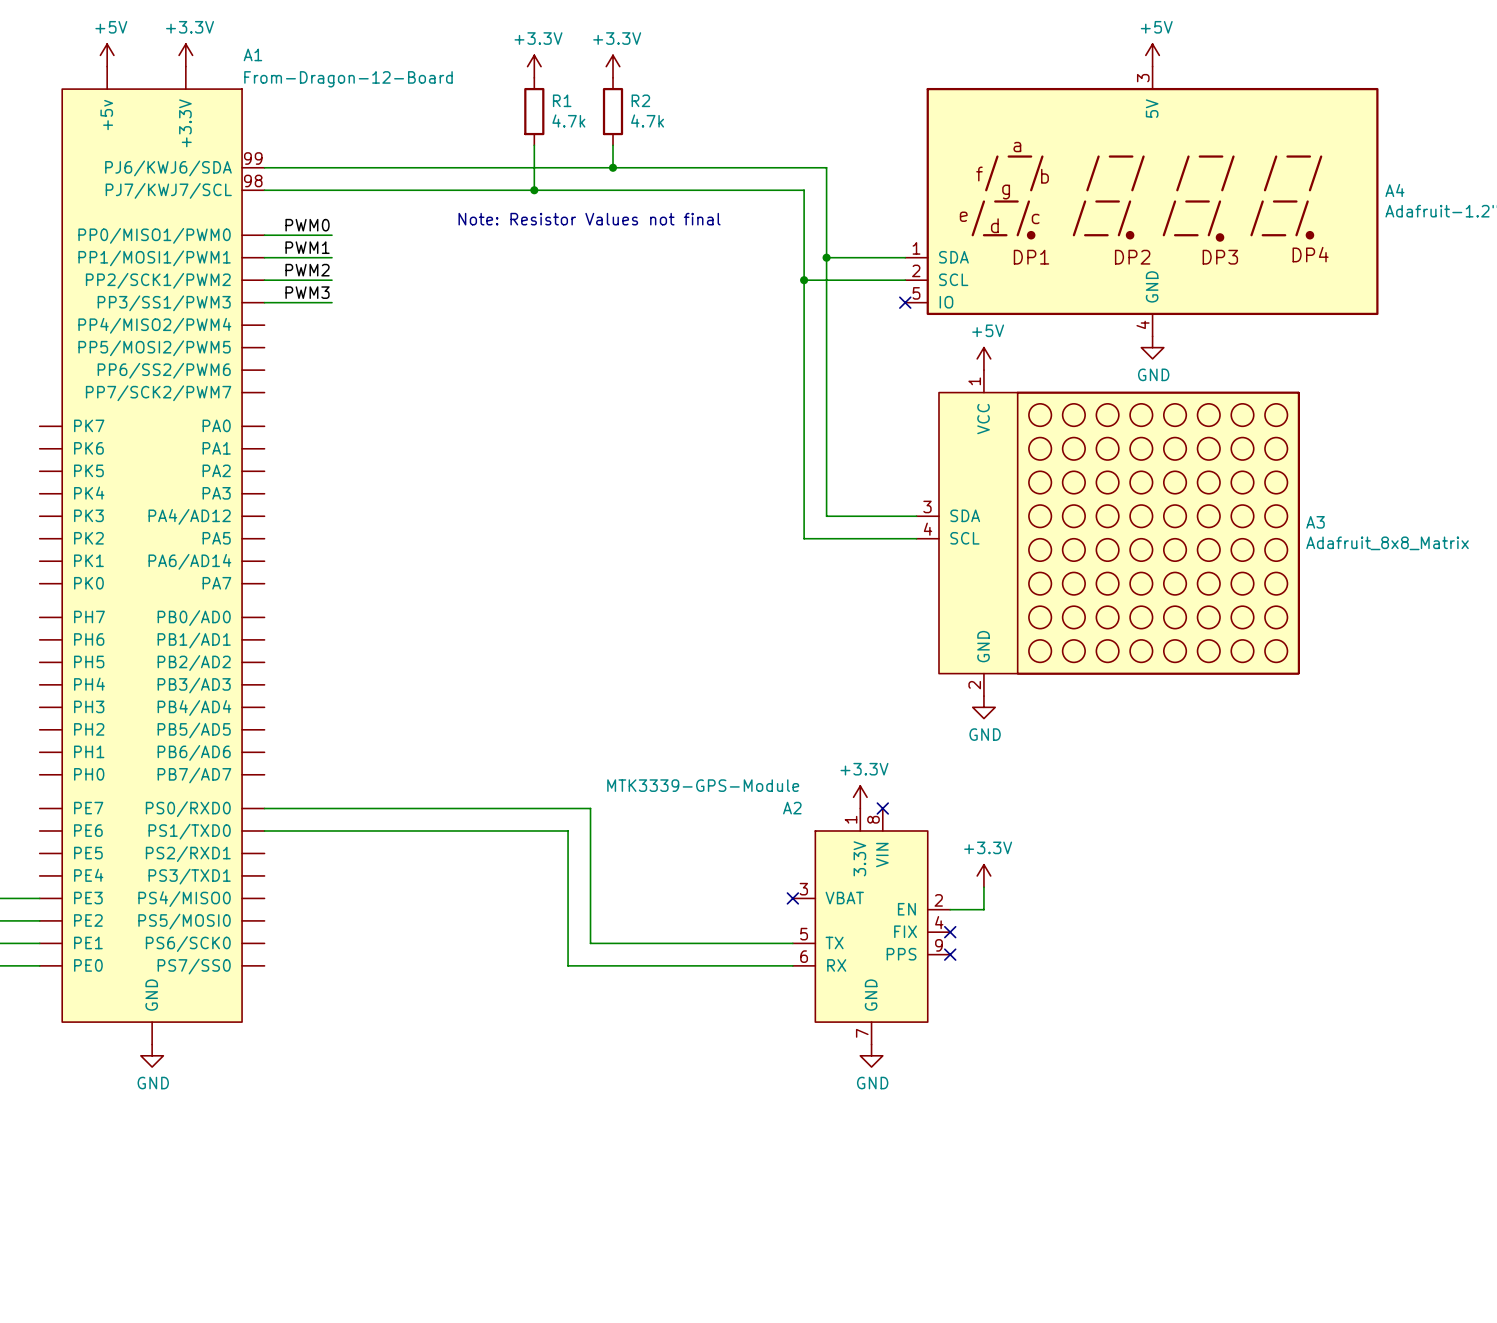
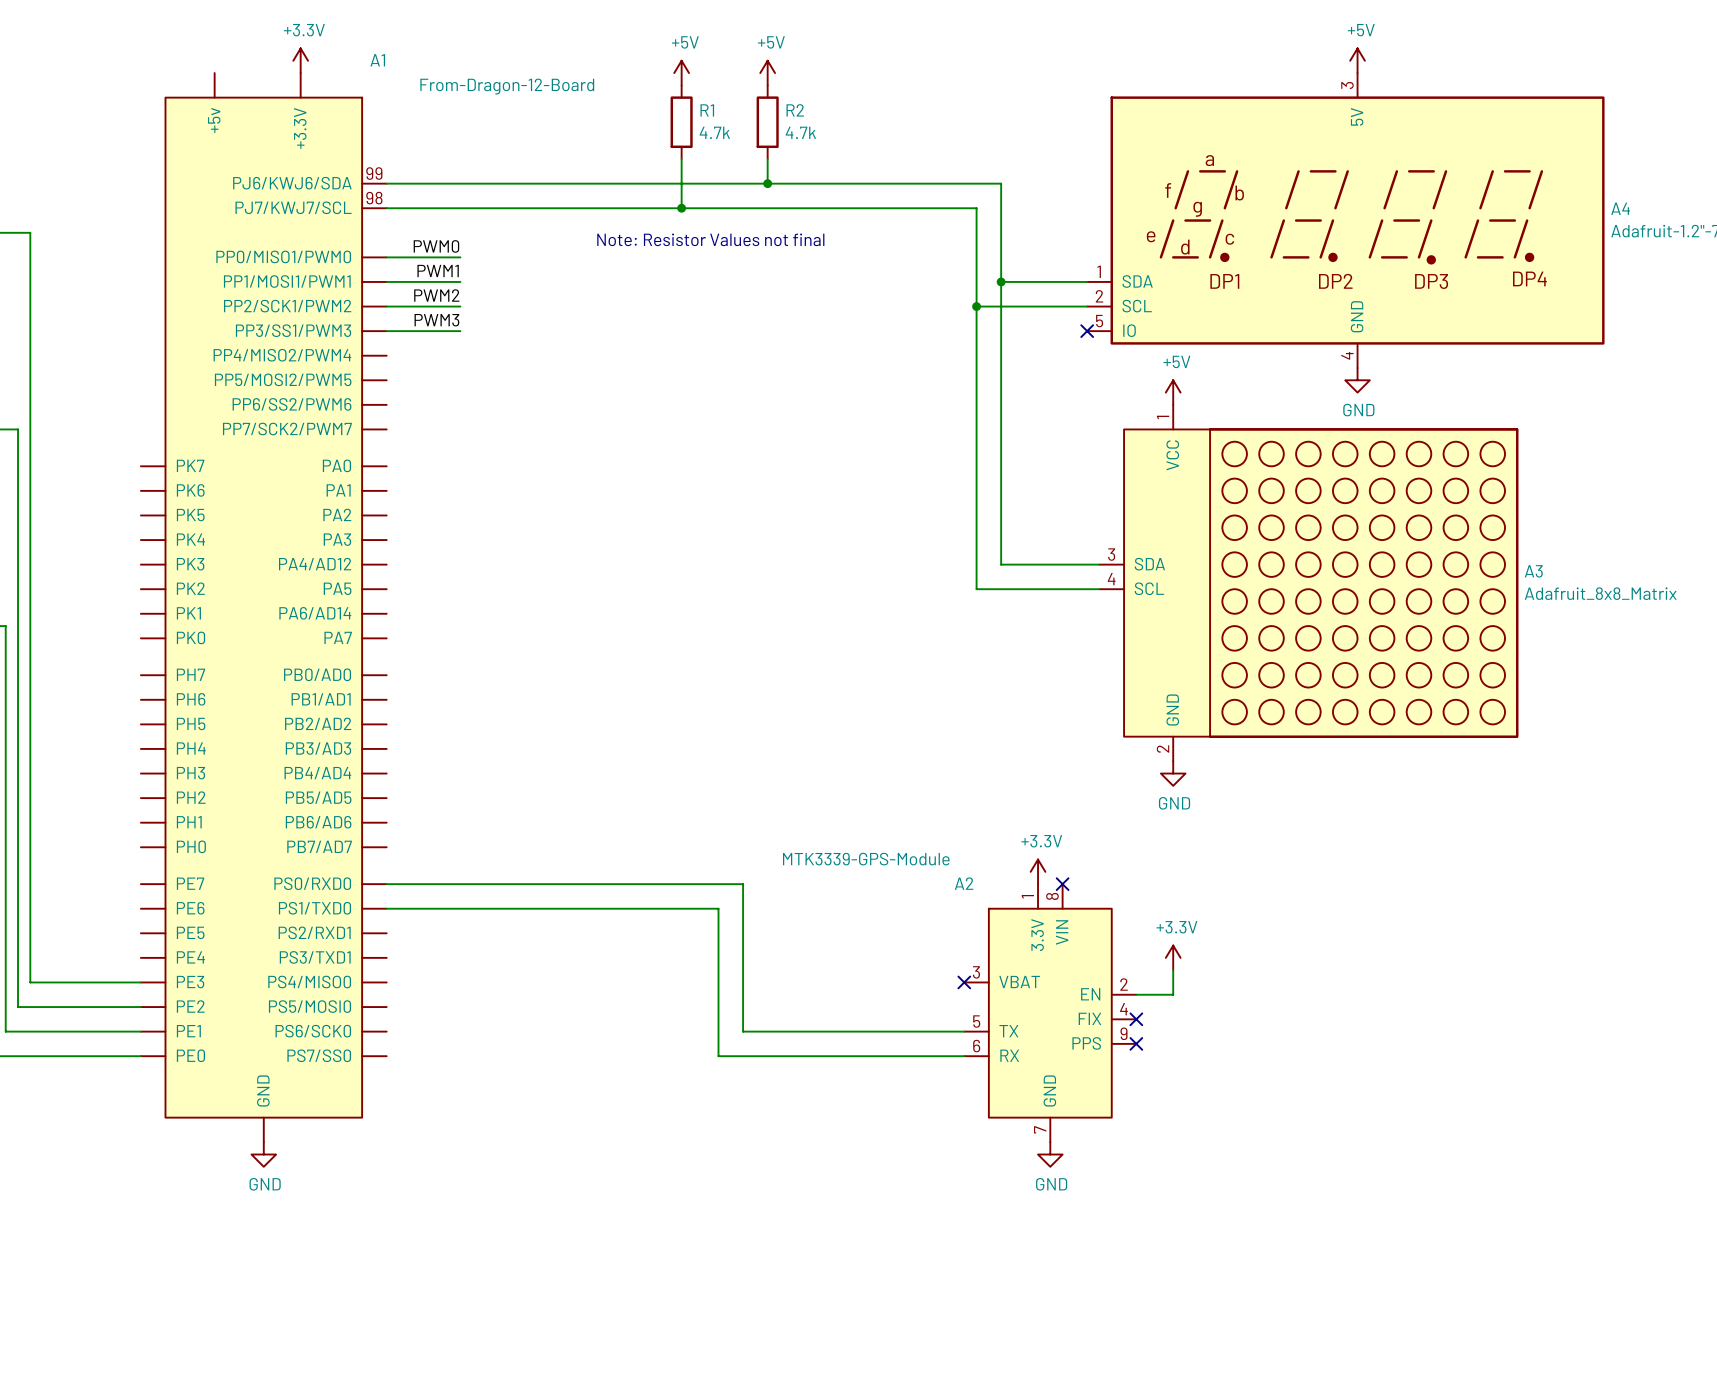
power symbol: +5V (107, 55) -> none
power symbol: +3.3V (534, 66) -> +5V (681, 73)
power symbol: +3.3V (613, 66) -> +5V (767, 73)

